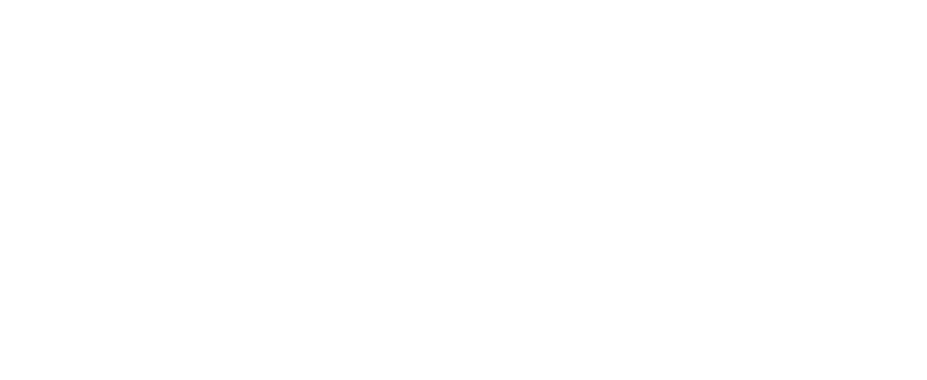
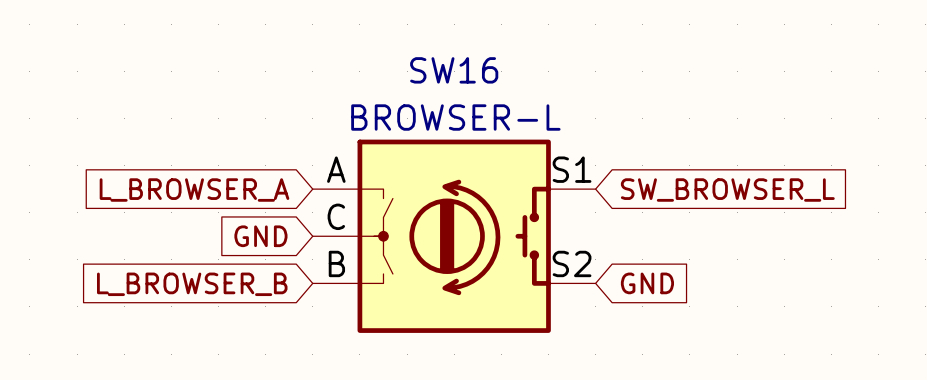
global label: none -> L_BROWSER_A (194, 190)
global label: none -> SW_BROWSER_L (727, 190)
global label: none -> GND (260, 236)
SW16: none -> BROWSER-L (454, 236)
global label: none -> L_BROWSER_B (192, 284)
global label: none -> GND (647, 283)

